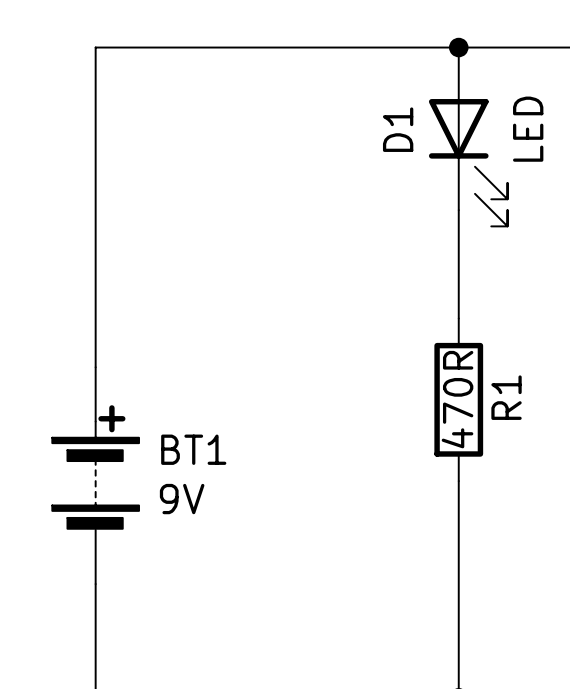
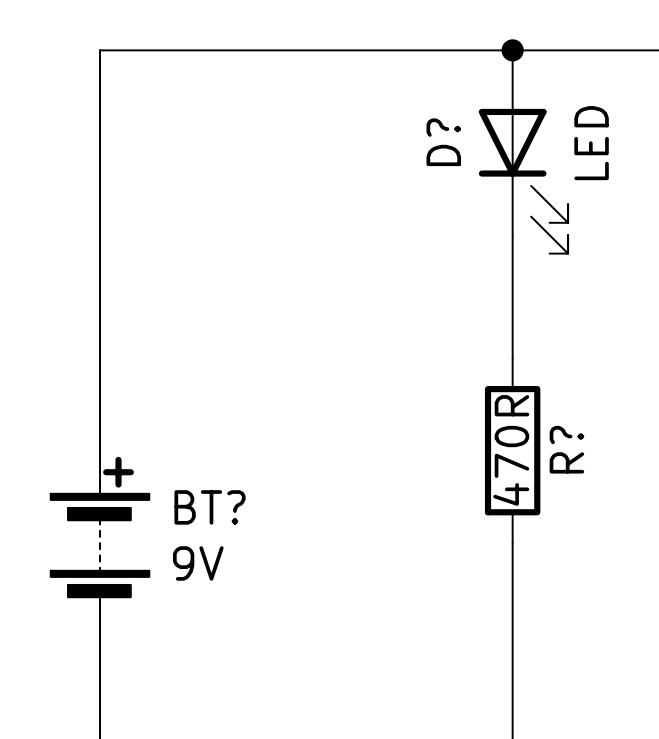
D1 name: D1 (398, 129) -> D? (443, 142)
R1 name: R1 (506, 397) -> R? (566, 449)
BT1 name: BT1 (193, 449) -> BT? (210, 507)

